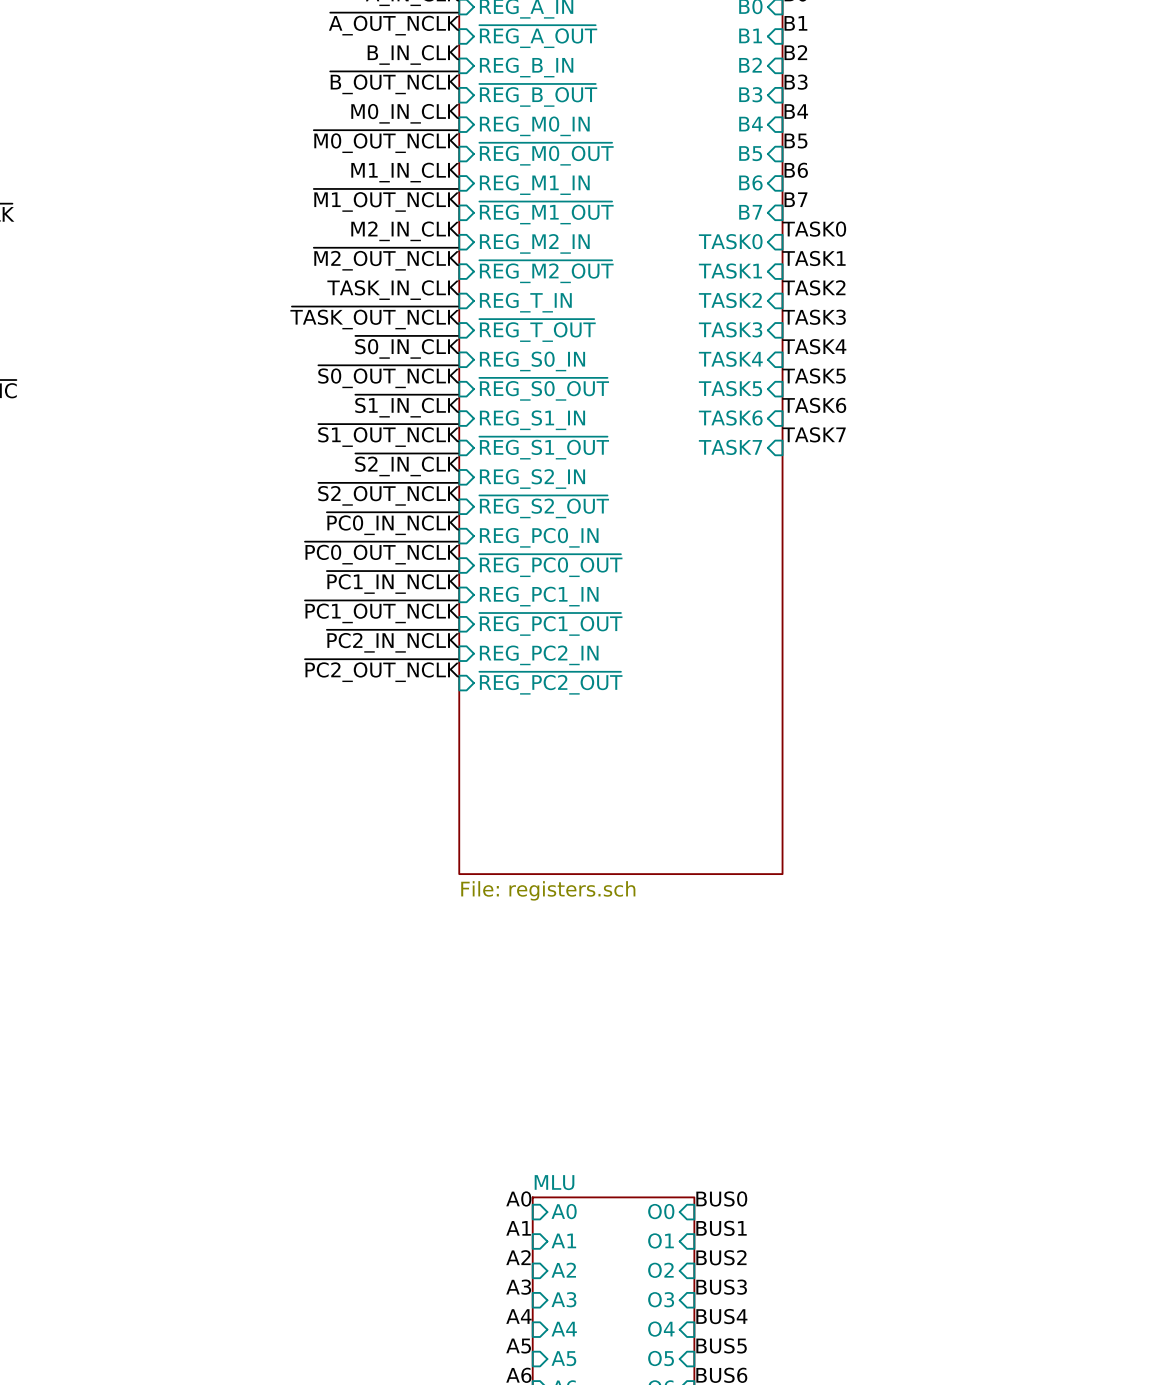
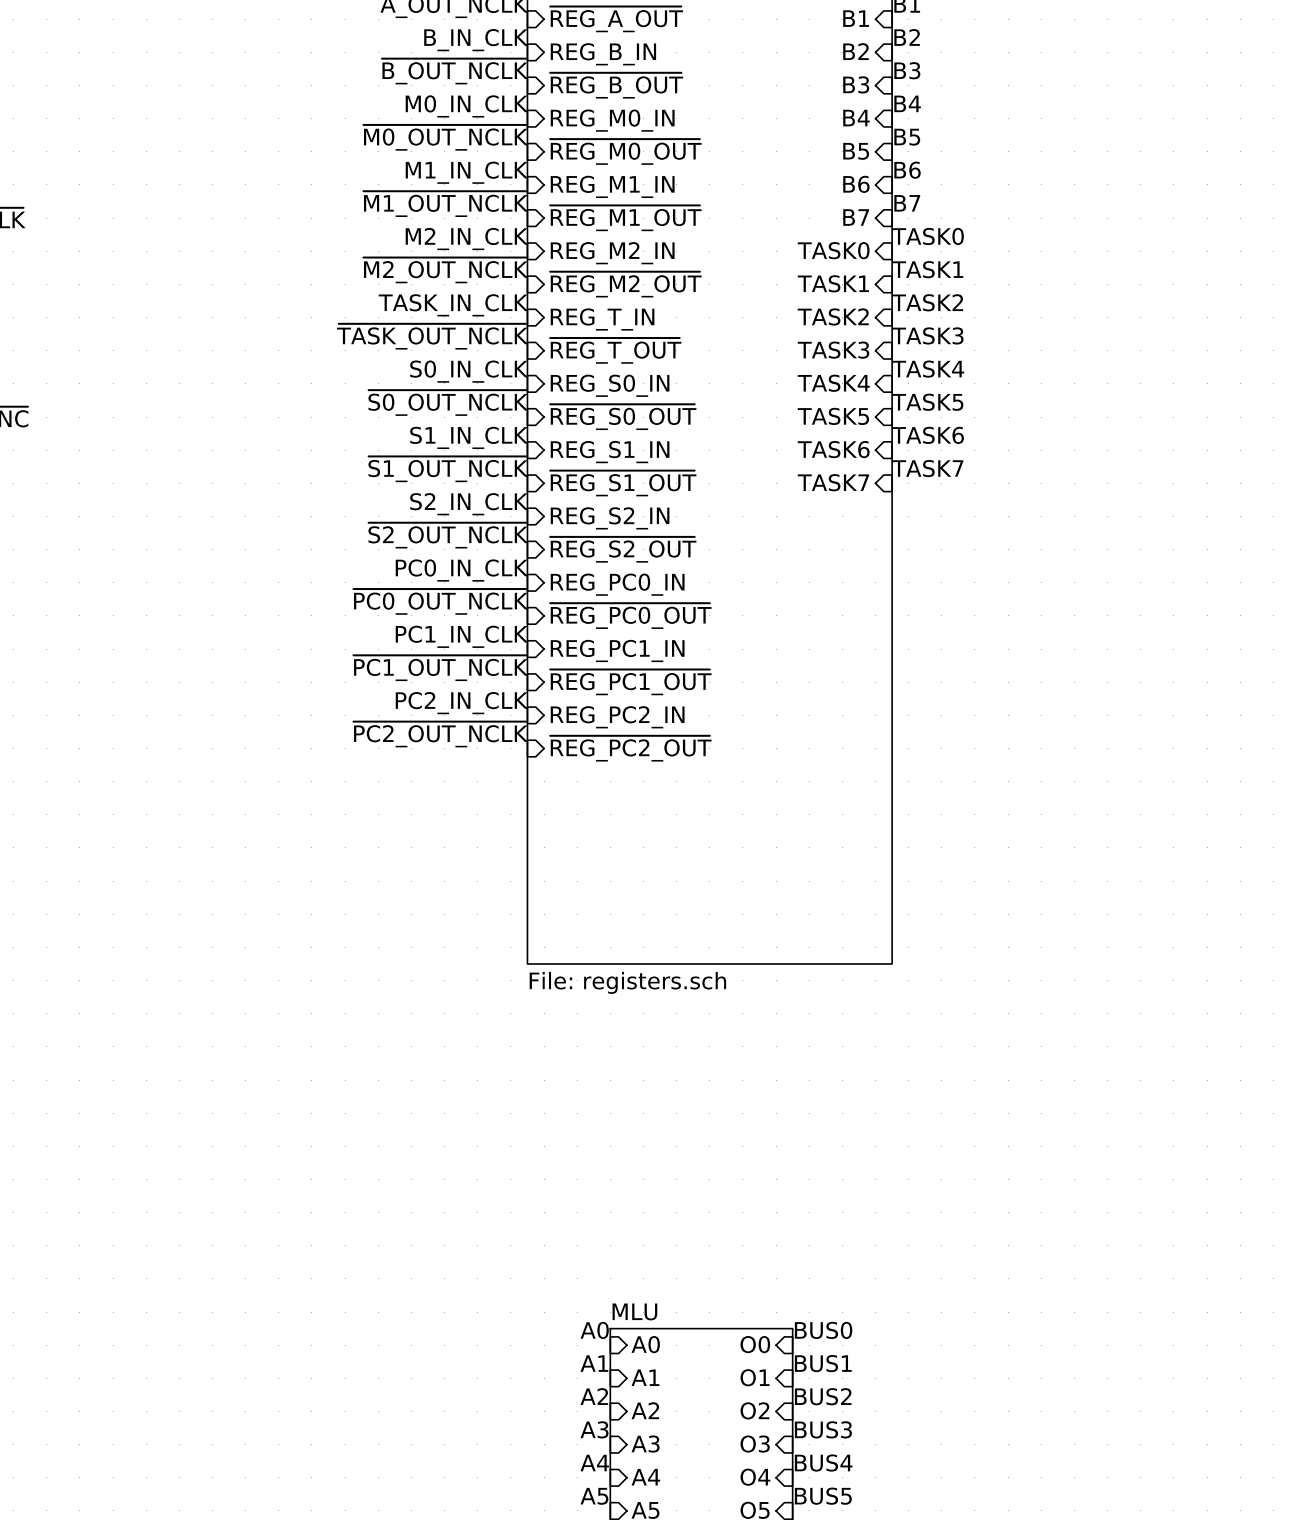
label: ~{S0_IN_CLK} (407, 347) -> S0_IN_CLK (469, 371)
label: ~{S1_IN_CLK} (407, 406) -> S1_IN_CLK (469, 437)
label: ~{S2_IN_CLK} (407, 464) -> S2_IN_CLK (469, 504)
label: ~{PC0_IN_NCLK} (393, 523) -> PC0_IN_CLK (461, 570)
label: ~{PC1_IN_NCLK} (393, 582) -> PC1_IN_CLK (461, 636)
label: ~{PC2_IN_NCLK} (393, 641) -> PC2_IN_CLK (461, 703)

